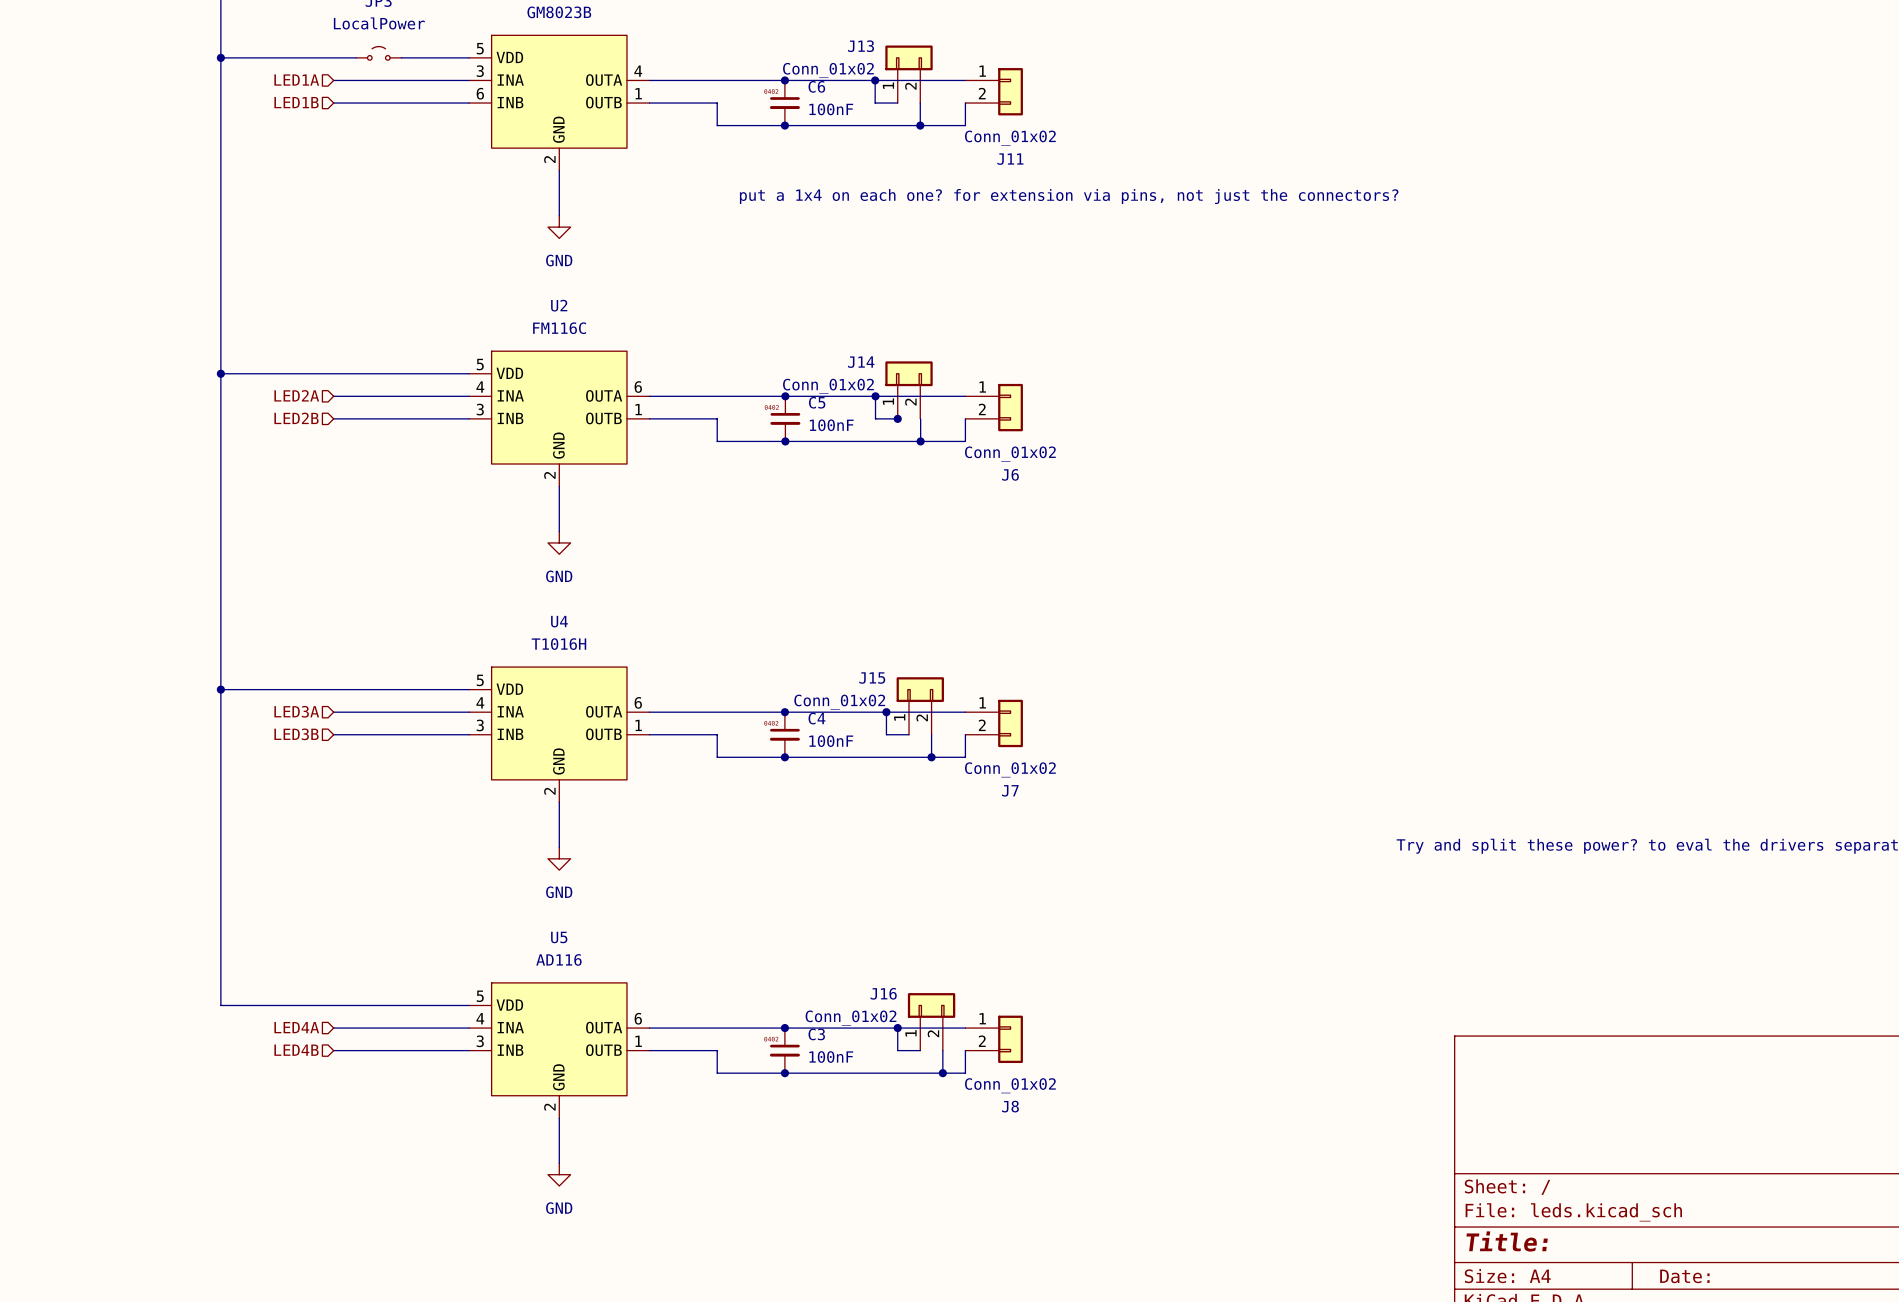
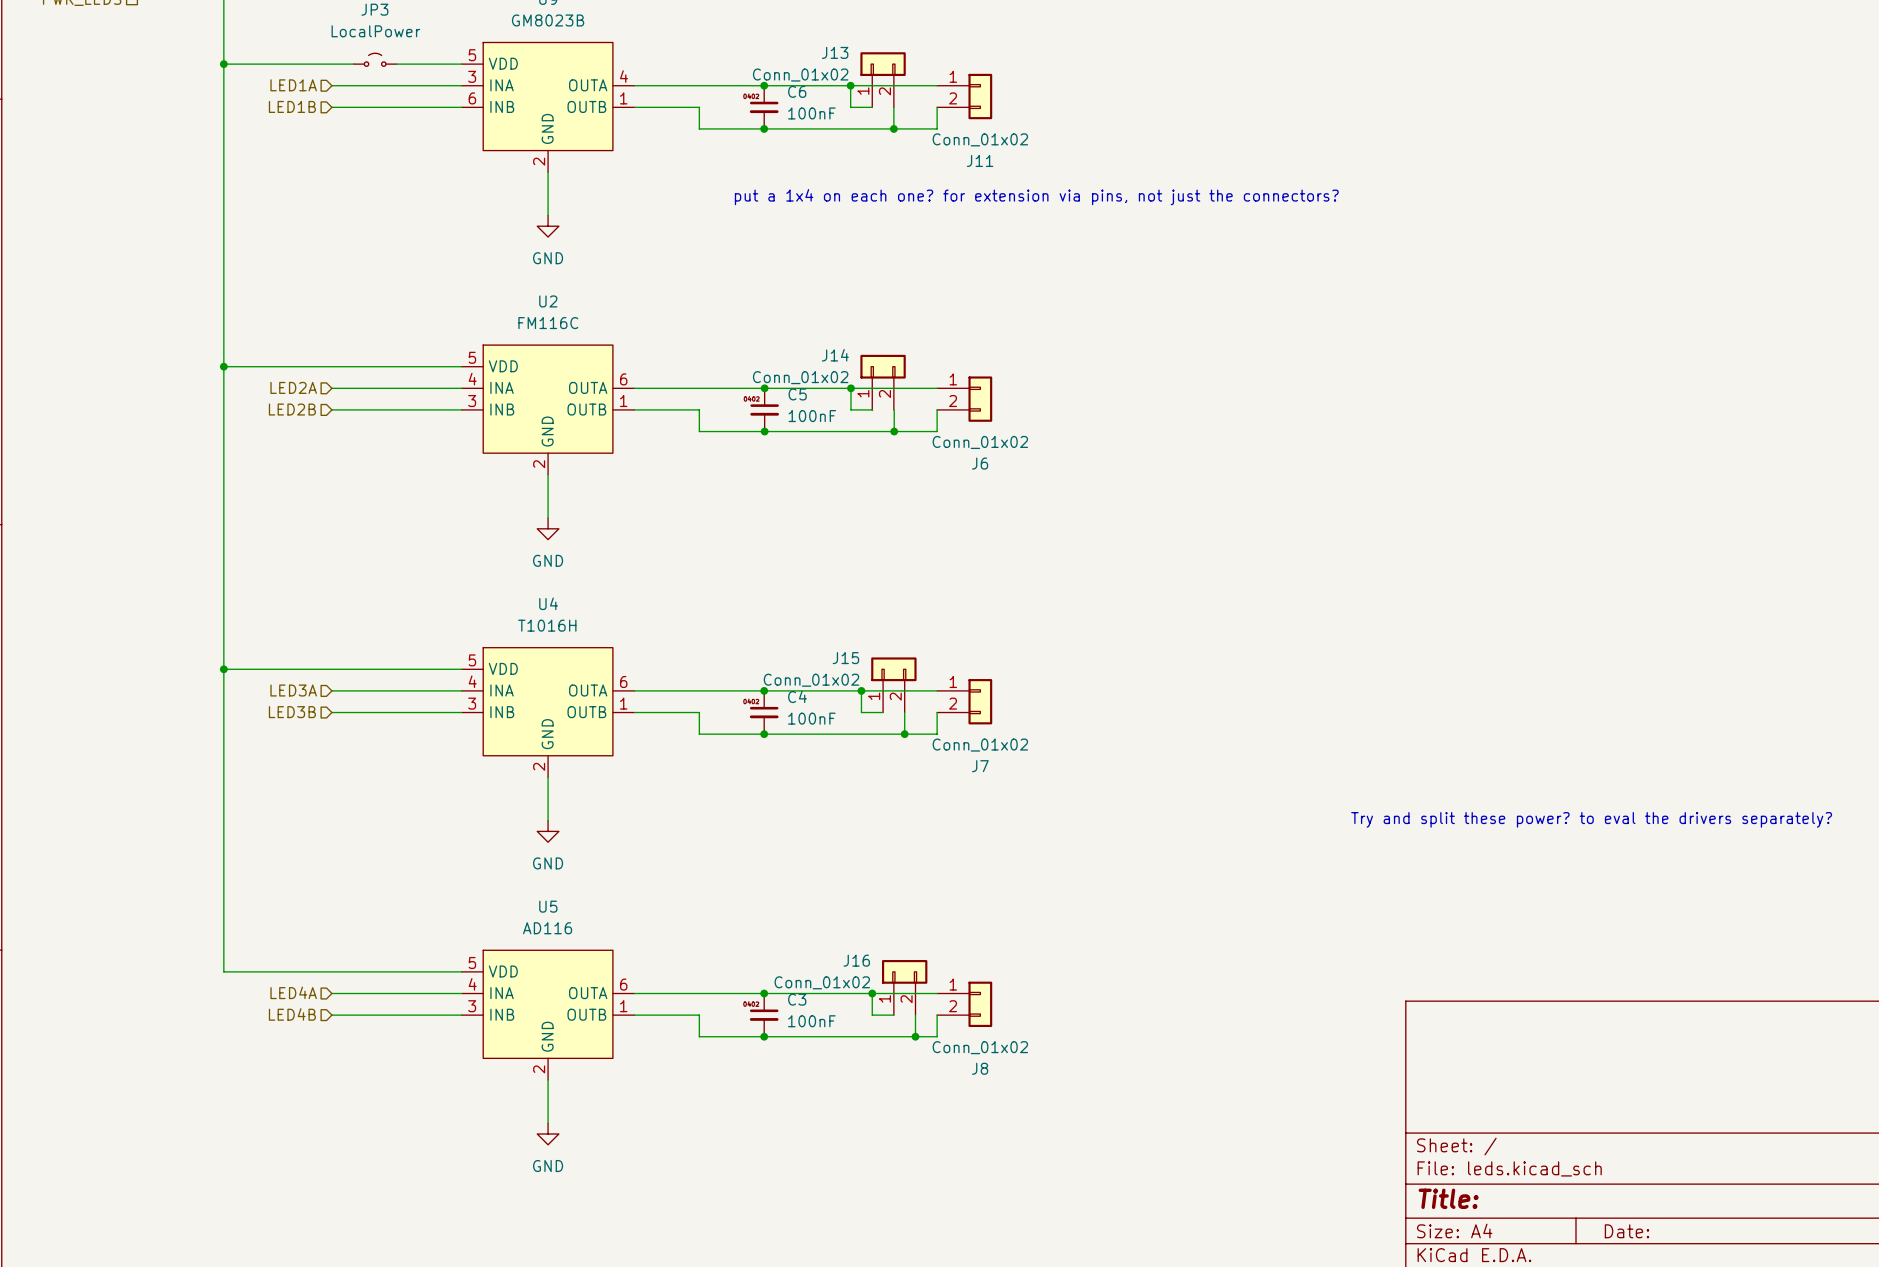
junction: (897, 418) -> none

